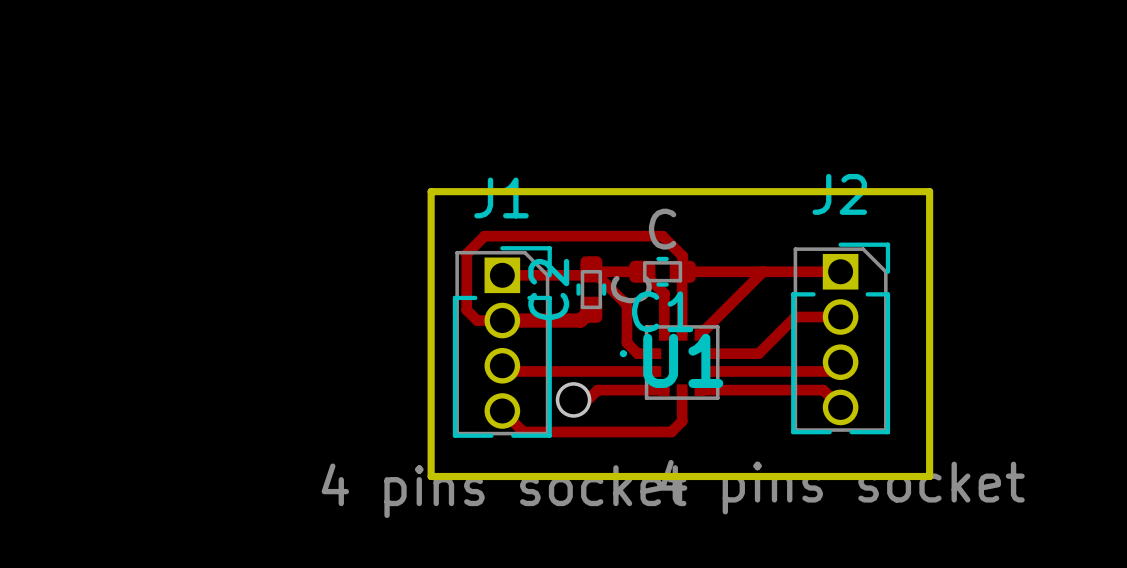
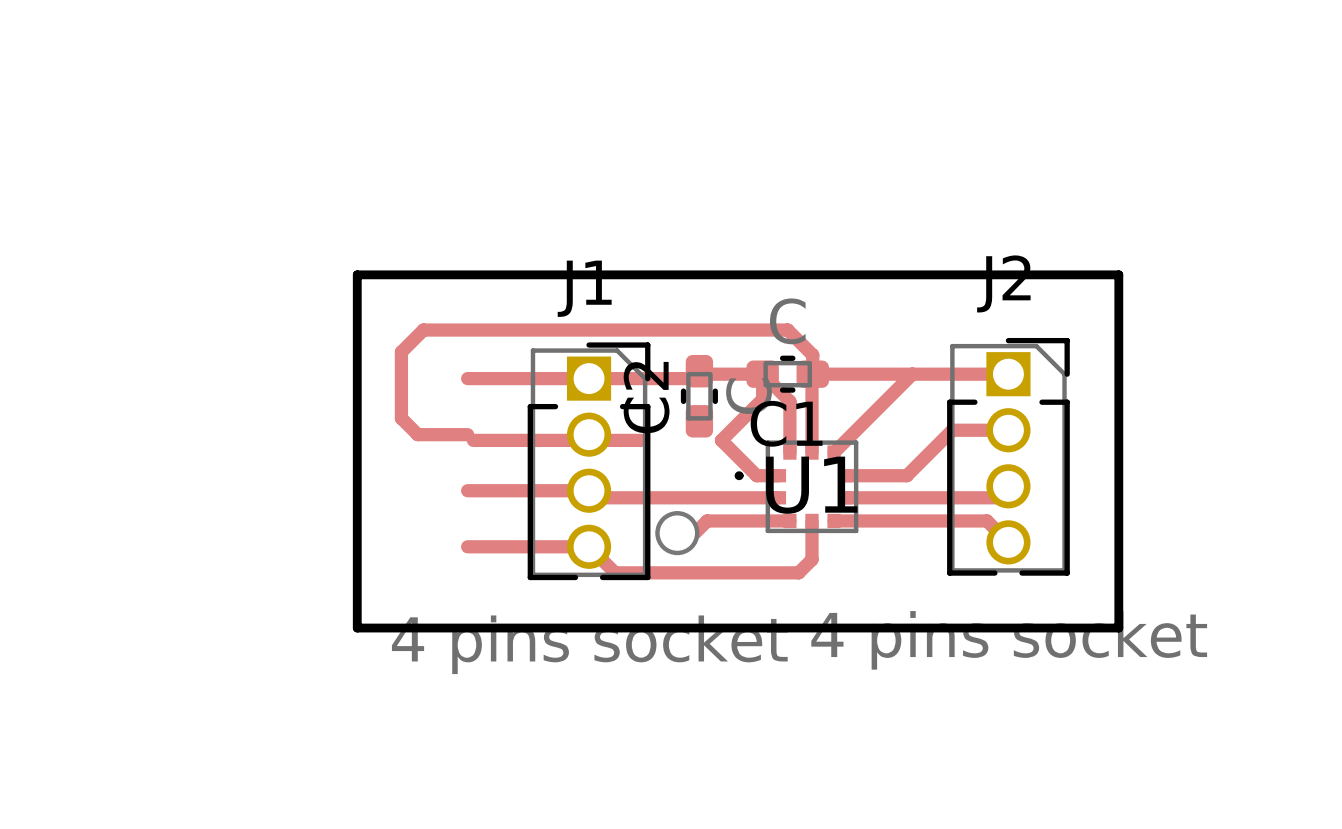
board edge: (431, 191) (431, 476) -> (500, 274) (357, 274) (357, 628) (500, 628)
track: (484, 236) (466, 253) (466, 310) (477, 320) (580, 320) (591, 309) -> (566, 330) (423, 330) (401, 352) (401, 418) (417, 434) (467, 434) (473, 440) (641, 440)
track: (591, 269) (626, 304) (626, 342) -> (762, 374) (762, 399) (721, 440) (743, 462)
track: none -> (467, 378) (589, 378)
track: none -> (467, 490) (589, 490)
track: none -> (467, 546) (589, 546)

